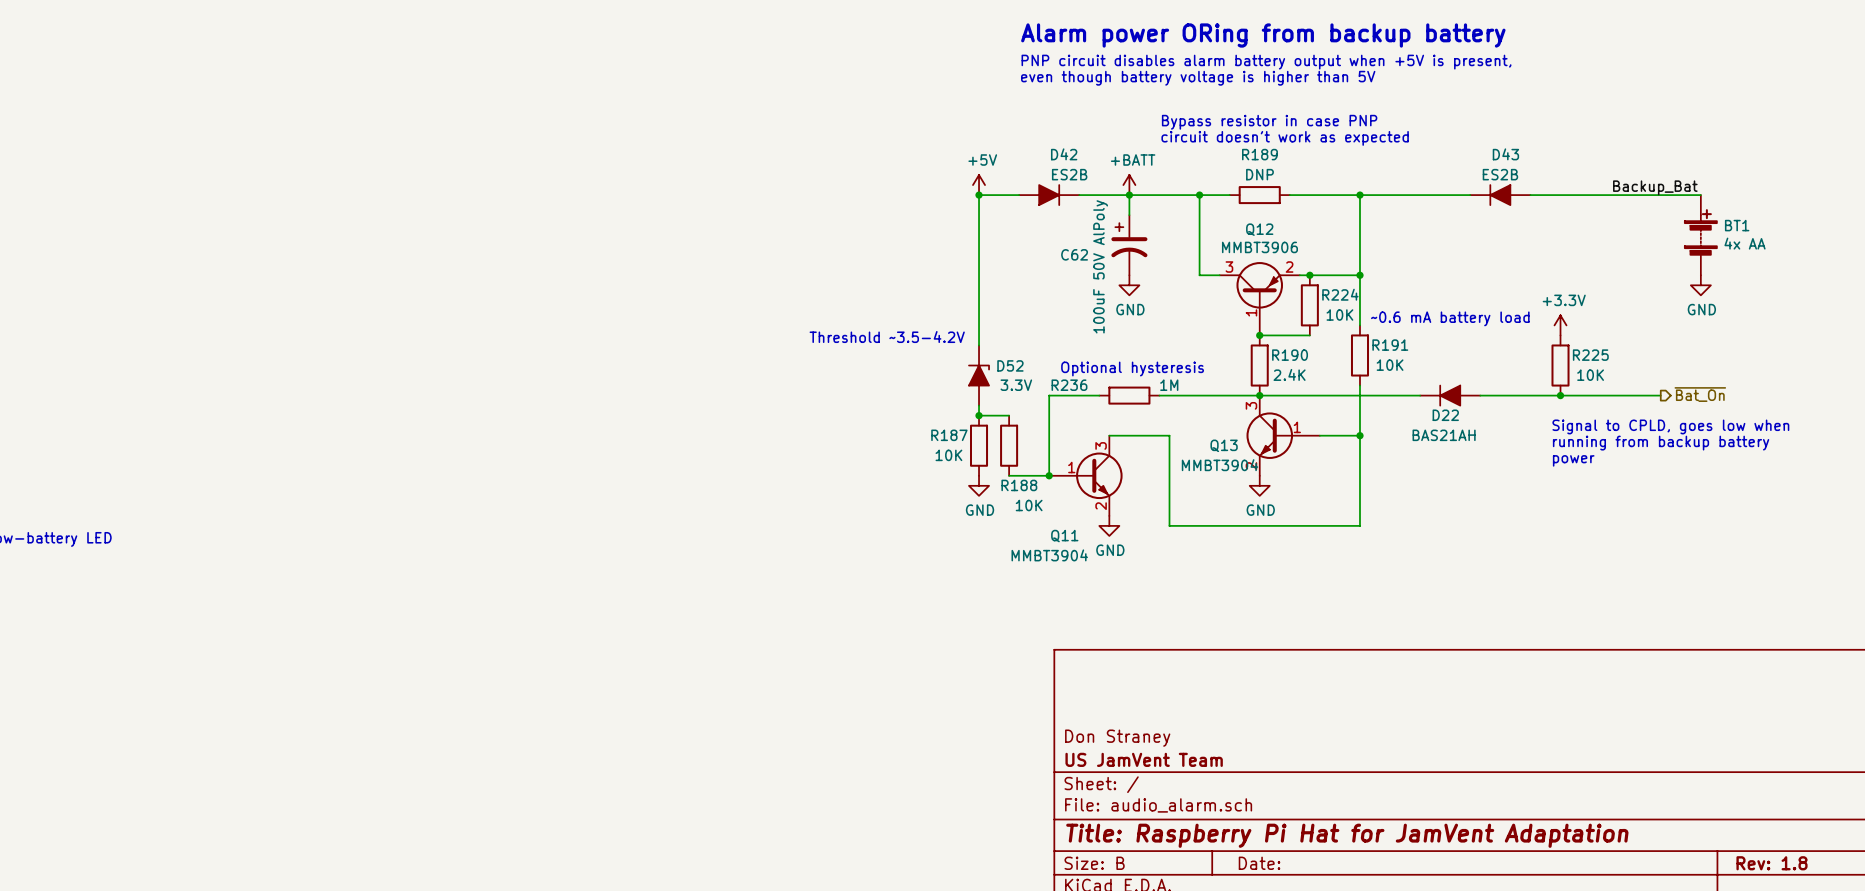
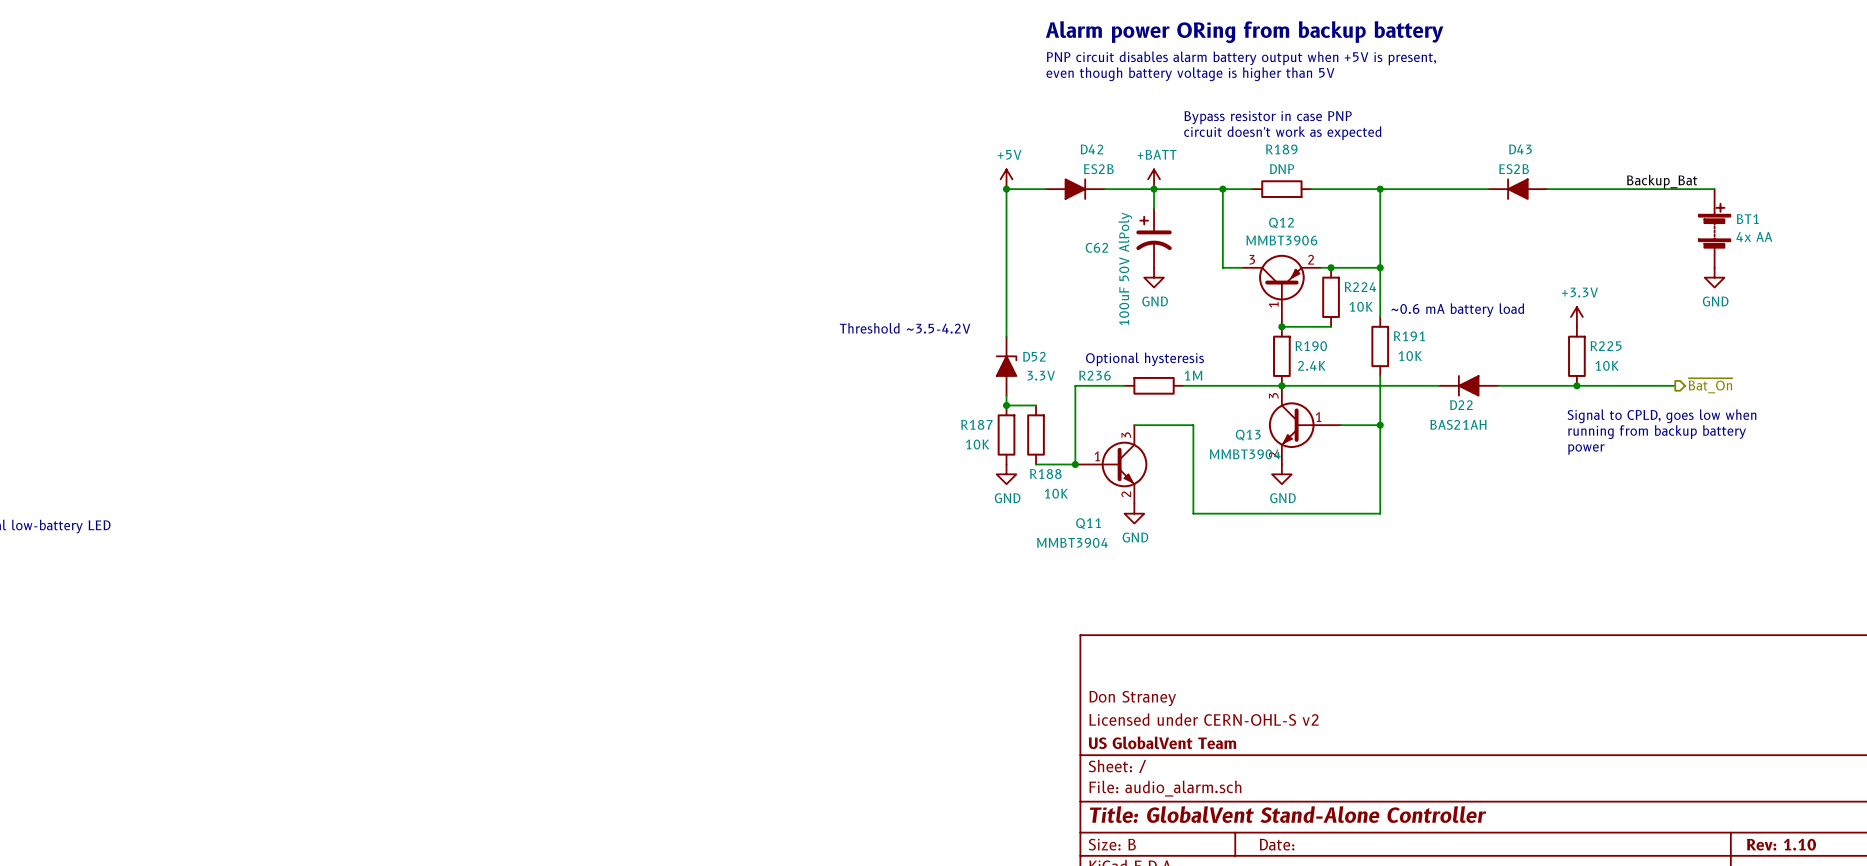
title block: none -> Don Straney (1132, 698)
title block: Don Straney (1117, 738) -> Licensed under CERN-OHL-S v2 (1203, 719)
title block: US JamVent Team (1144, 759) -> US GlobalVent Team (1162, 742)
title block: Title: Raspberry Pi Hat for JamVent Adaptation (1347, 835) -> Title: GlobalVent Stand-Alone Controller (1288, 814)
title block: Rev: 1.8 (1772, 863) -> Rev: 1.10 (1781, 844)

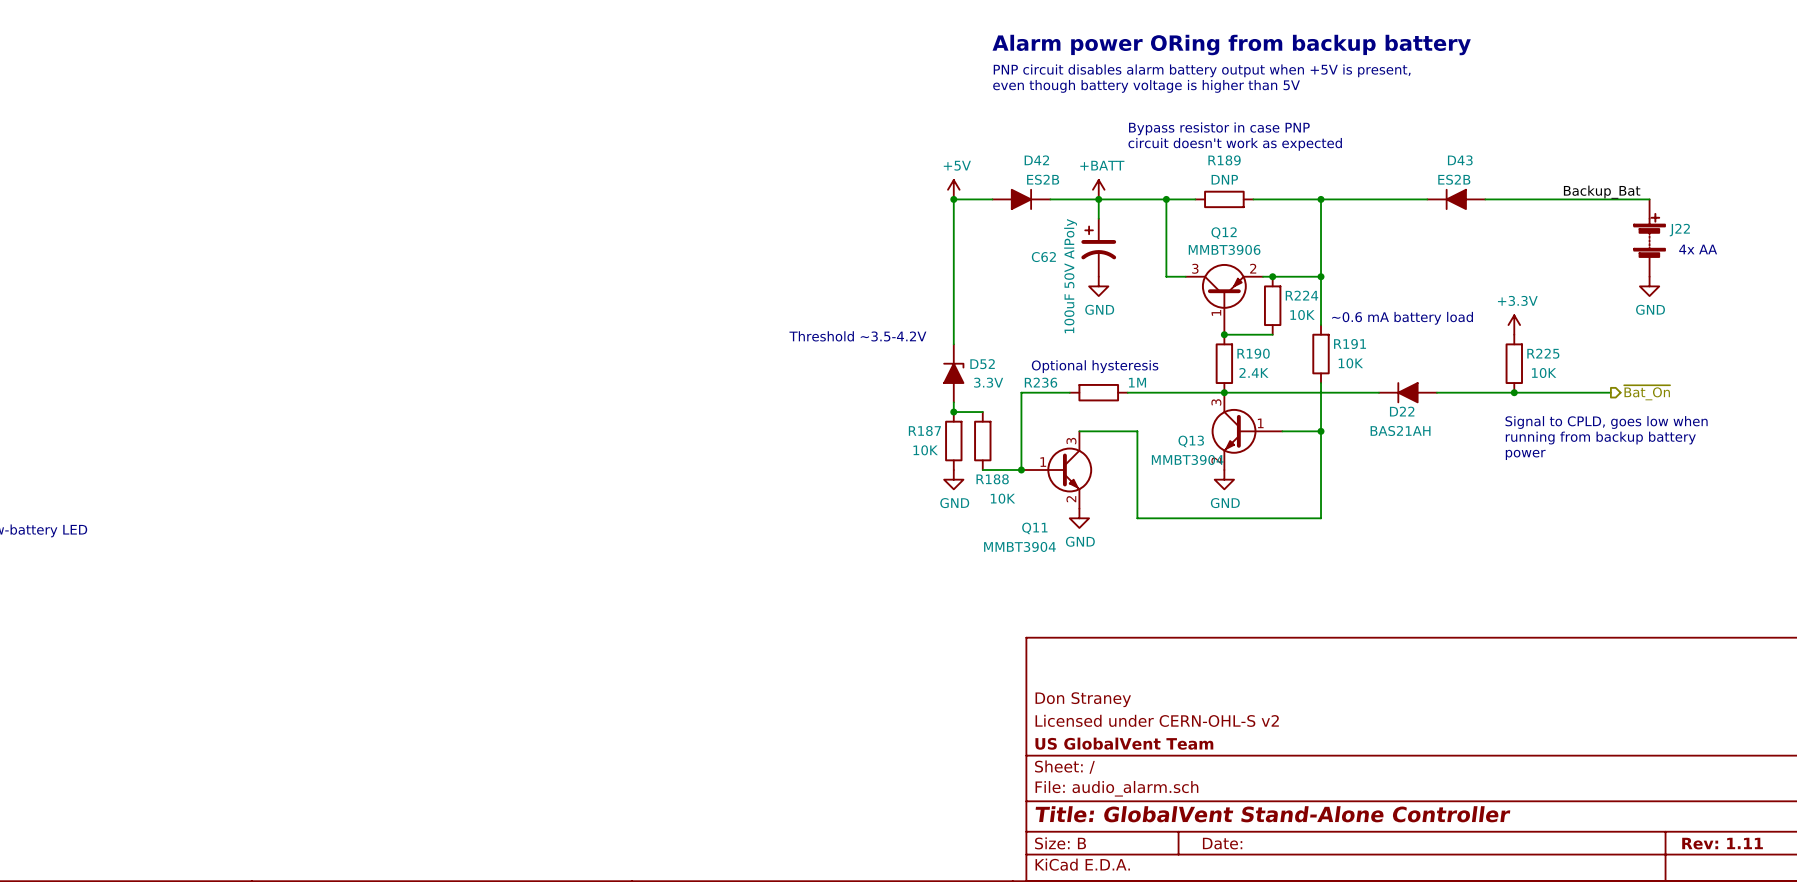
BT1 name: BT1 (1747, 219) -> J22 (1679, 230)
BT1 value: 4x AA (1754, 236) -> none
text: none -> 4x AA (1698, 249)
title block: Rev: 1.10 (1781, 844) -> Rev: 1.11 (1722, 843)

